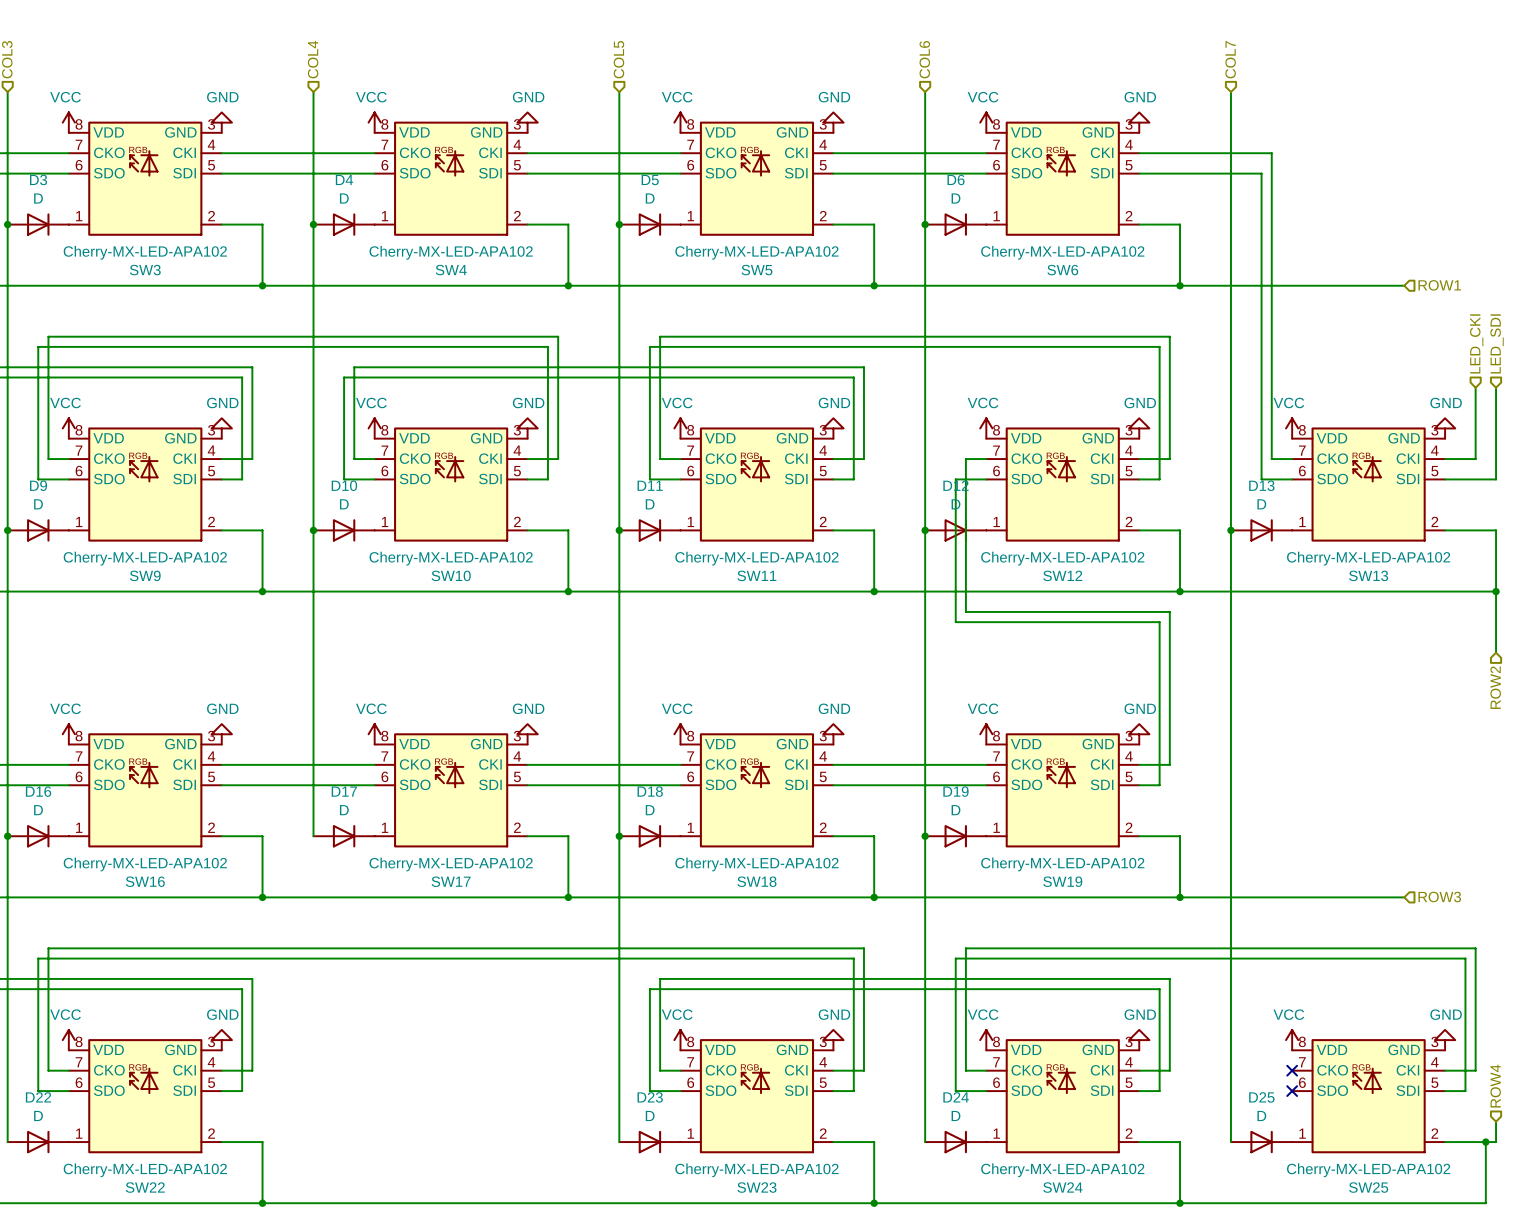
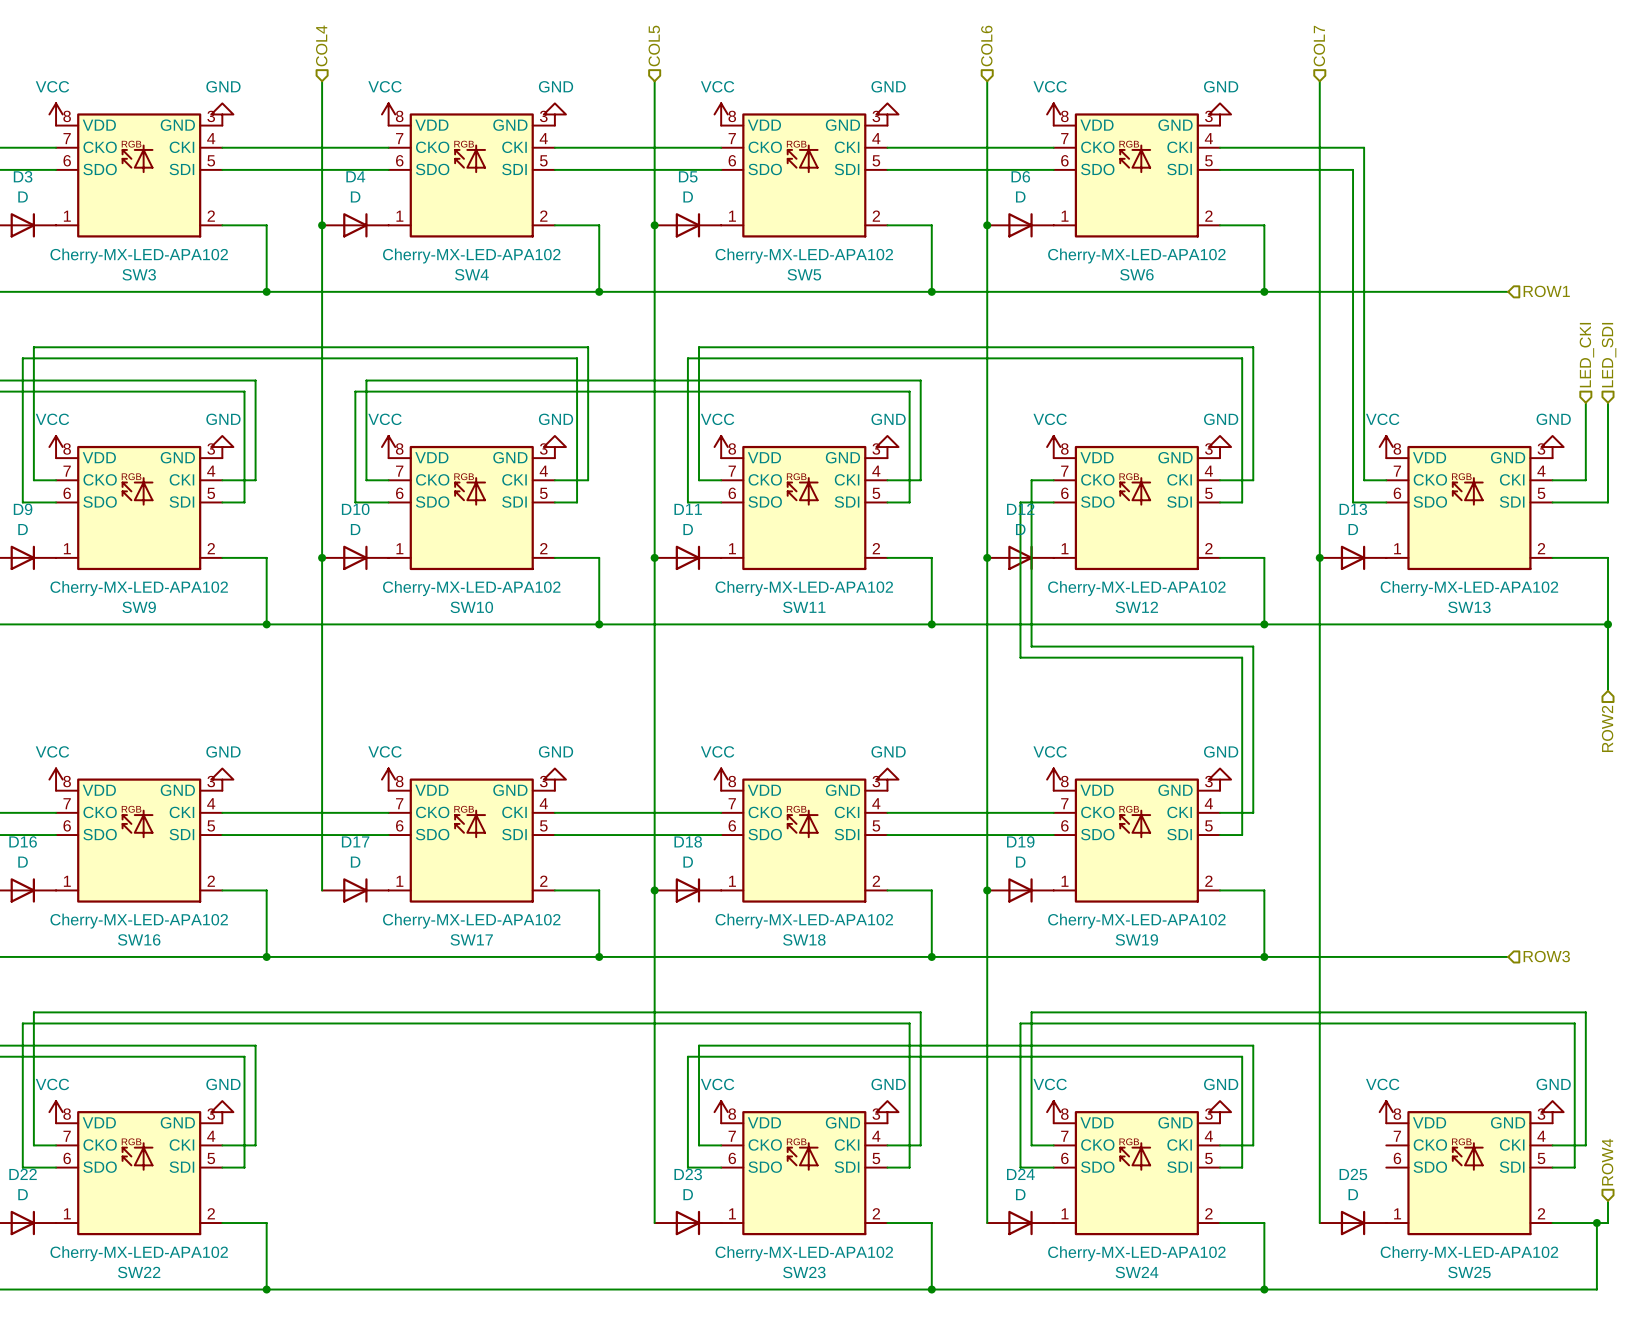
no-connect mark: (1292, 1070) -> none
no-connect mark: (1292, 1091) -> none

